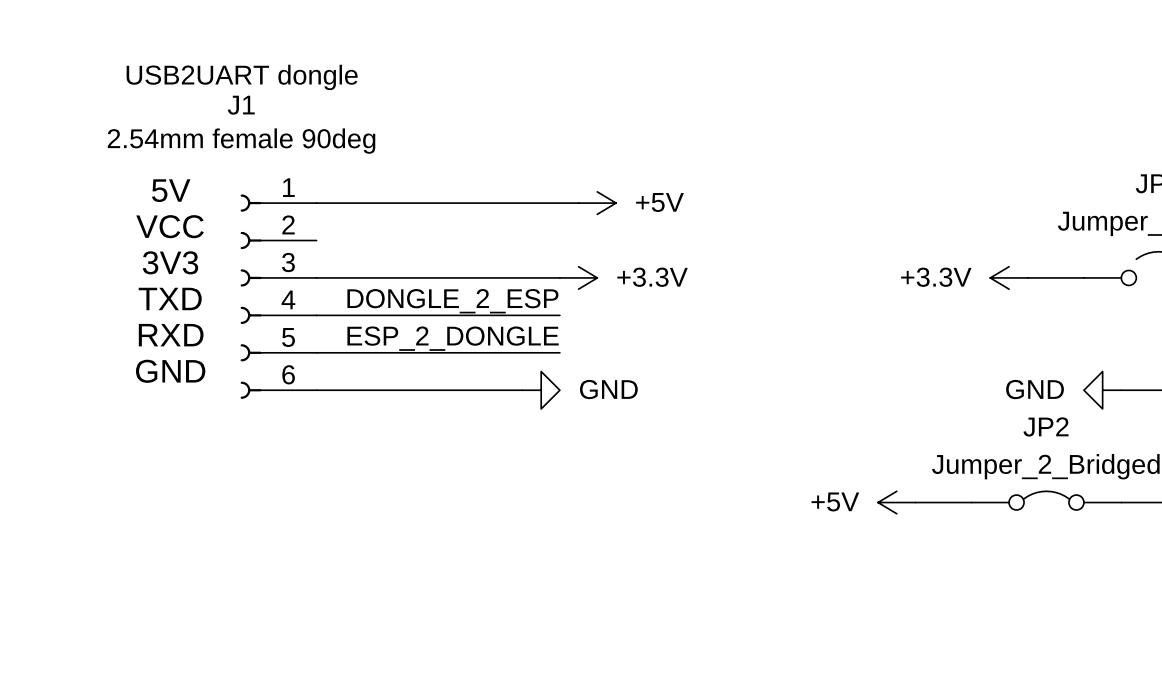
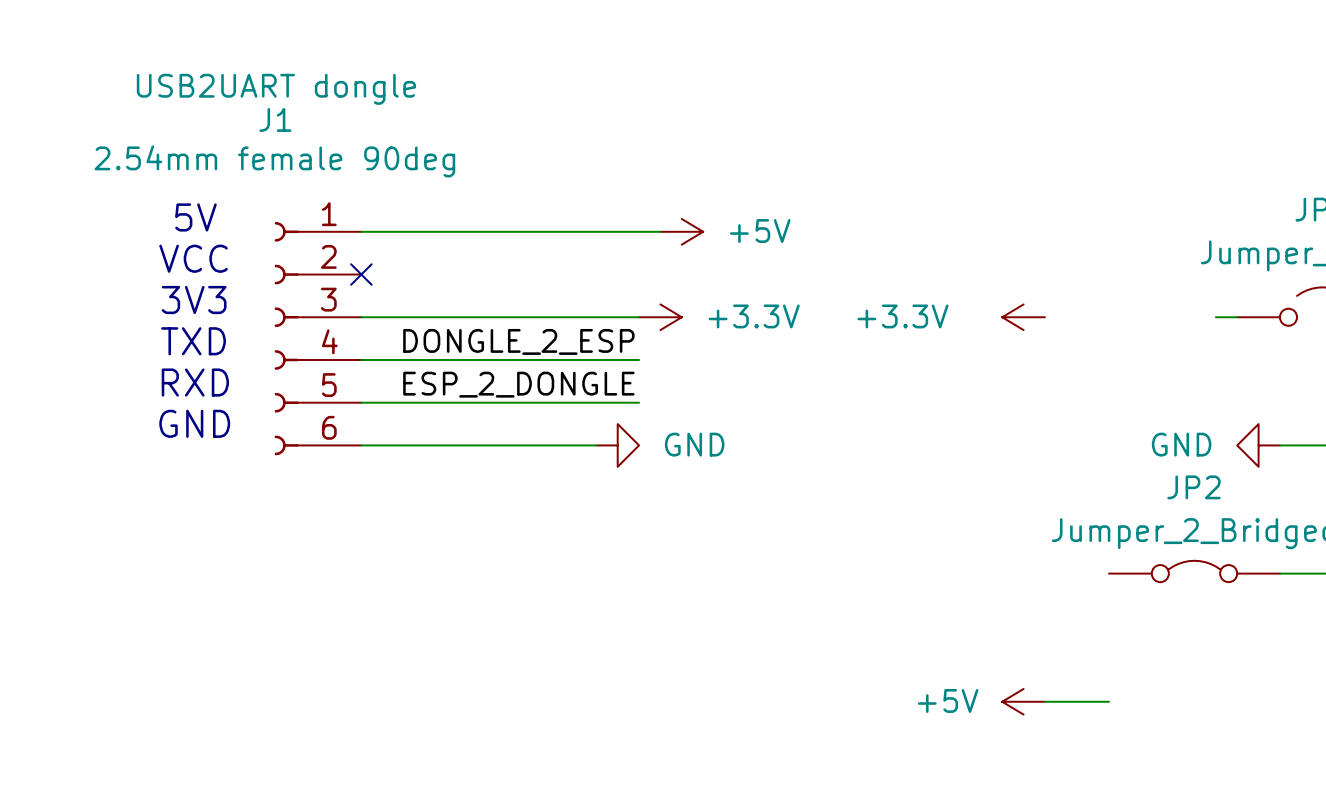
no-connect mark: none -> (361, 274)
power symbol text position: +3.3V (936, 277) -> +3.3V (902, 316)
power symbol position: +3.3V (1009, 277) -> +3.3V (1023, 317)
wire: (1027, 277) (1065, 277) -> none
power symbol position: +5V (896, 502) -> +5V (1023, 701)
wire: (915, 502) (971, 502) -> (1044, 701) (1109, 701)

